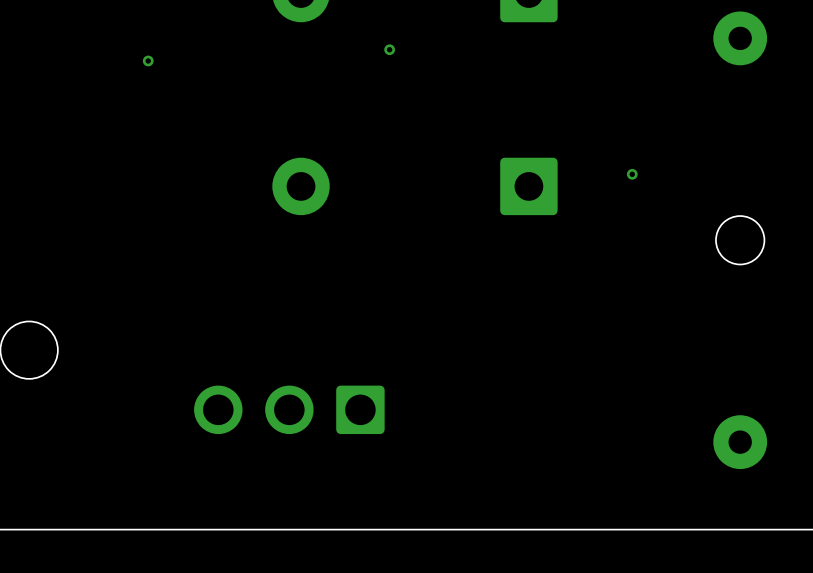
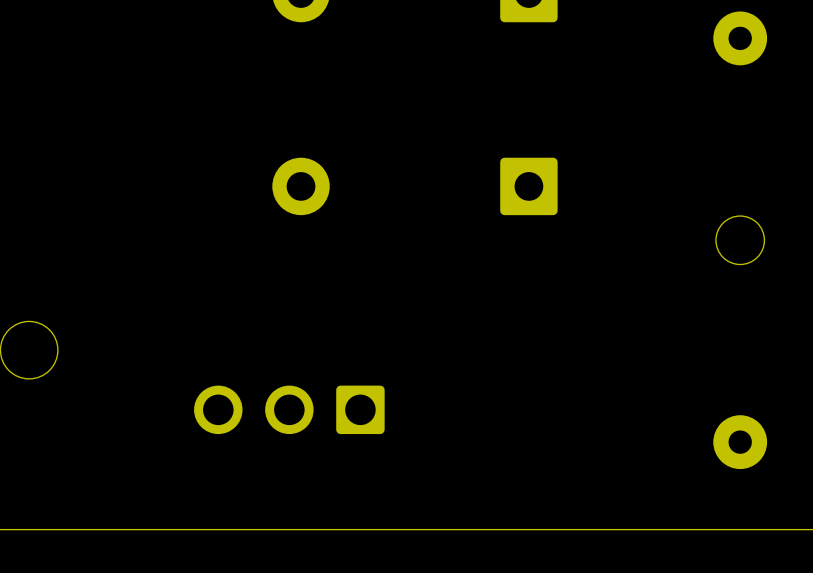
via: (389, 49) -> none
via: (148, 60) -> none
via: (632, 174) -> none

